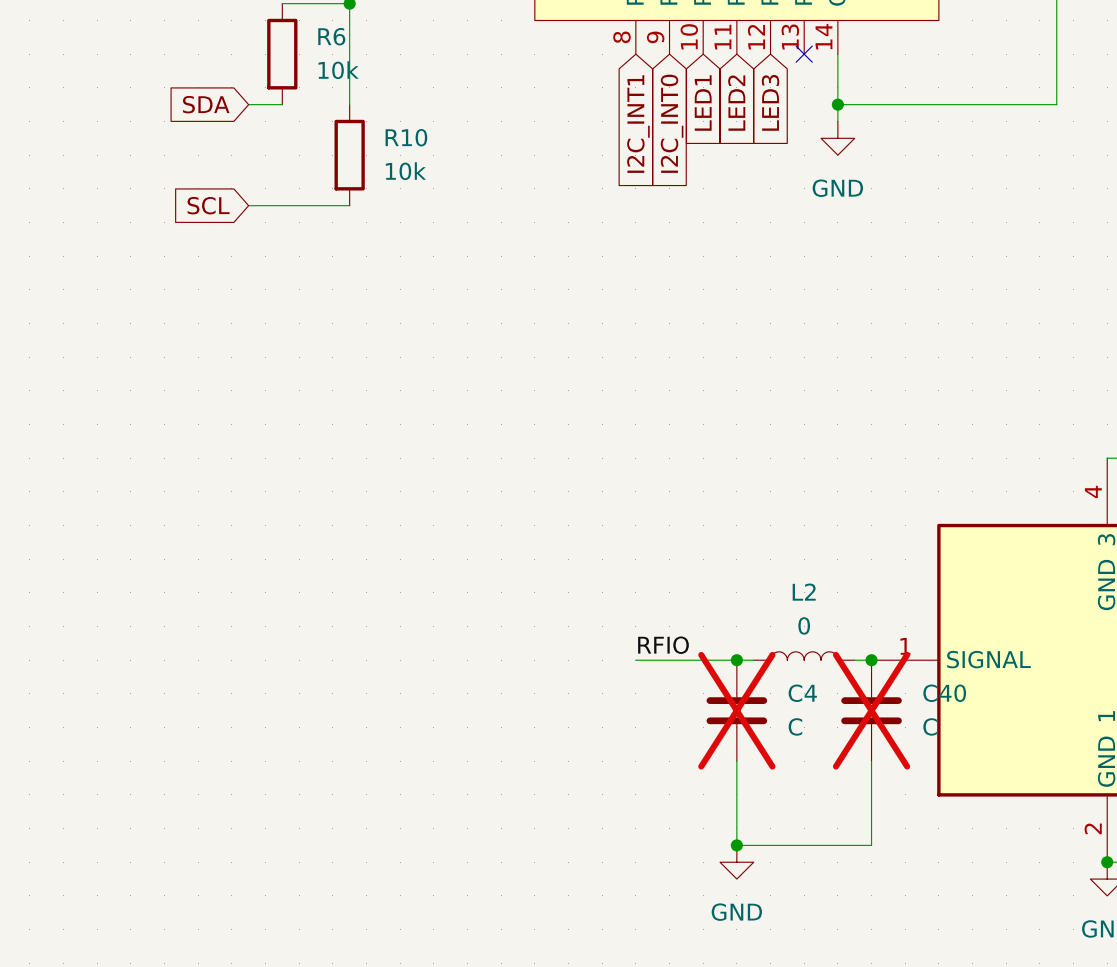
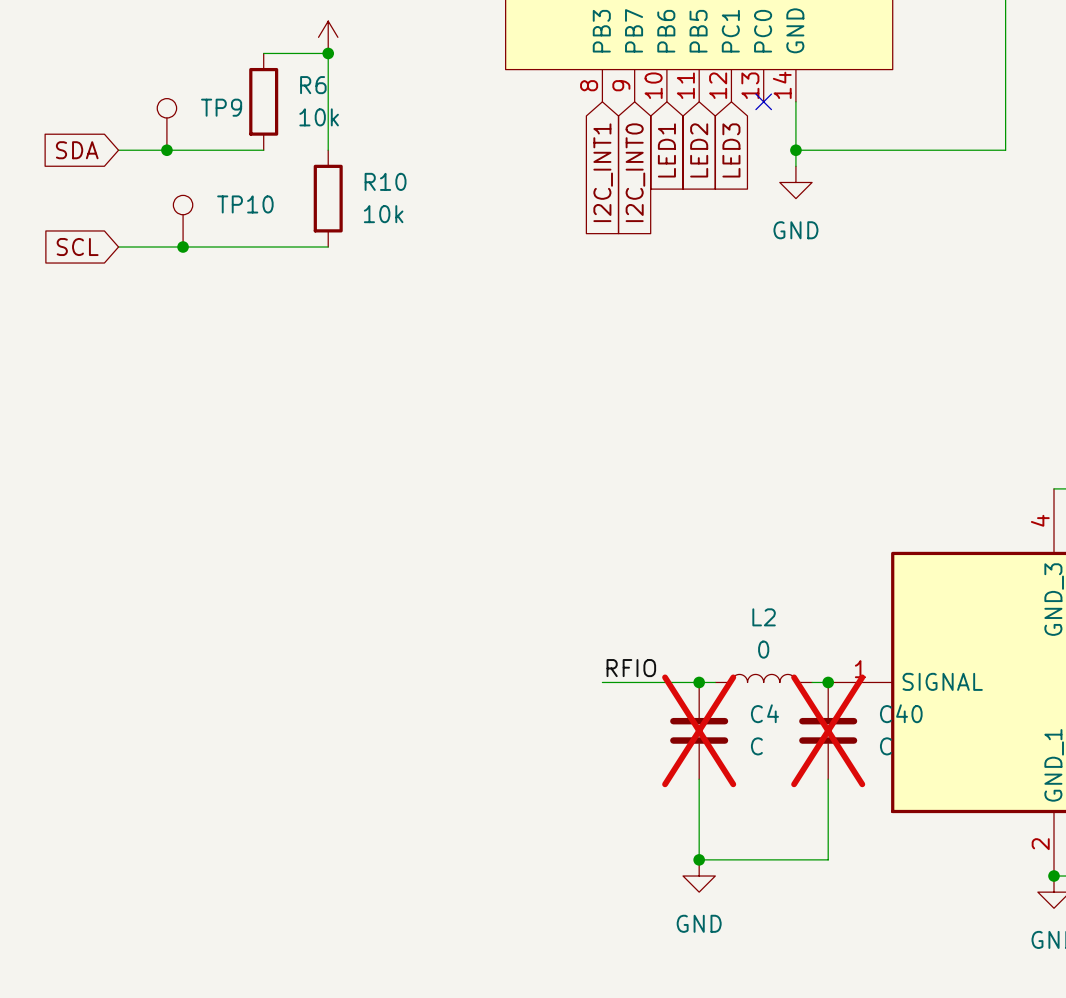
TP9: none -> (166, 124)
wire: none -> (118, 150) (231, 150)
junction: none -> (166, 150)
global label position: SDA (206, 104) -> SDA (77, 150)
TP10: none -> (183, 221)
wire: none -> (118, 247) (231, 247)
junction: none -> (183, 247)
global label position: SCL (208, 205) -> SCL (77, 247)

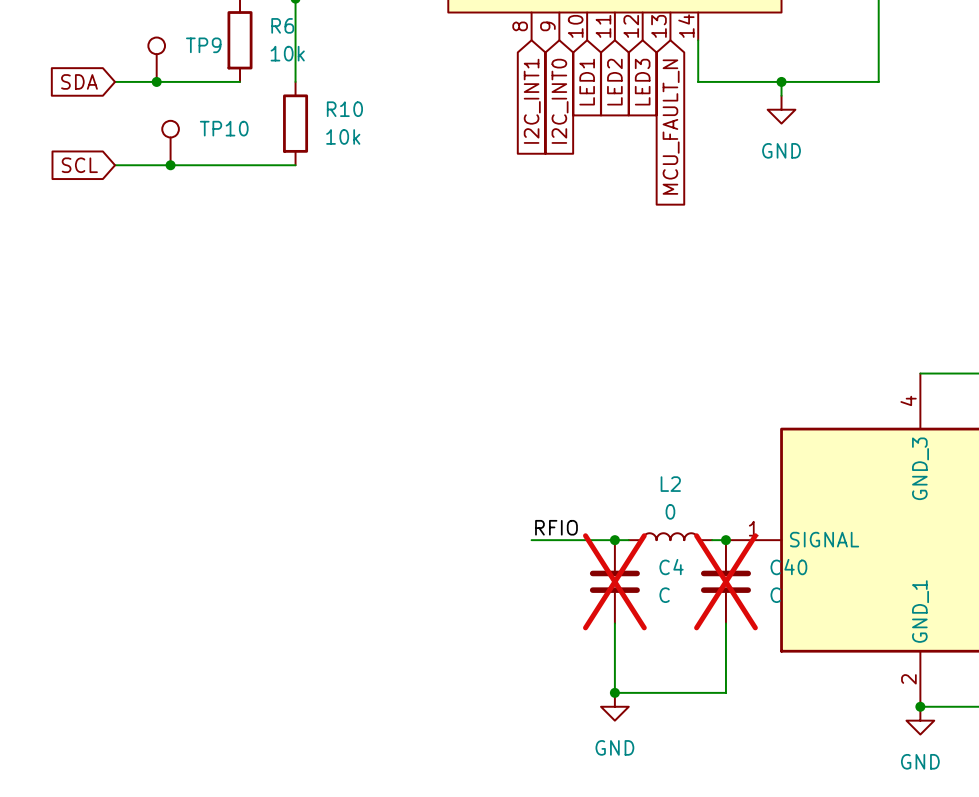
no-connect mark: (763, 101) -> none
wire: (795, 150) (795, 166) -> (781, 81) (781, 95)
junction: (795, 150) -> none
junction: none -> (781, 81)
power symbol position: GND (795, 182) -> GND (781, 109)
global label: none -> MCU_FAULT_N (671, 127)

